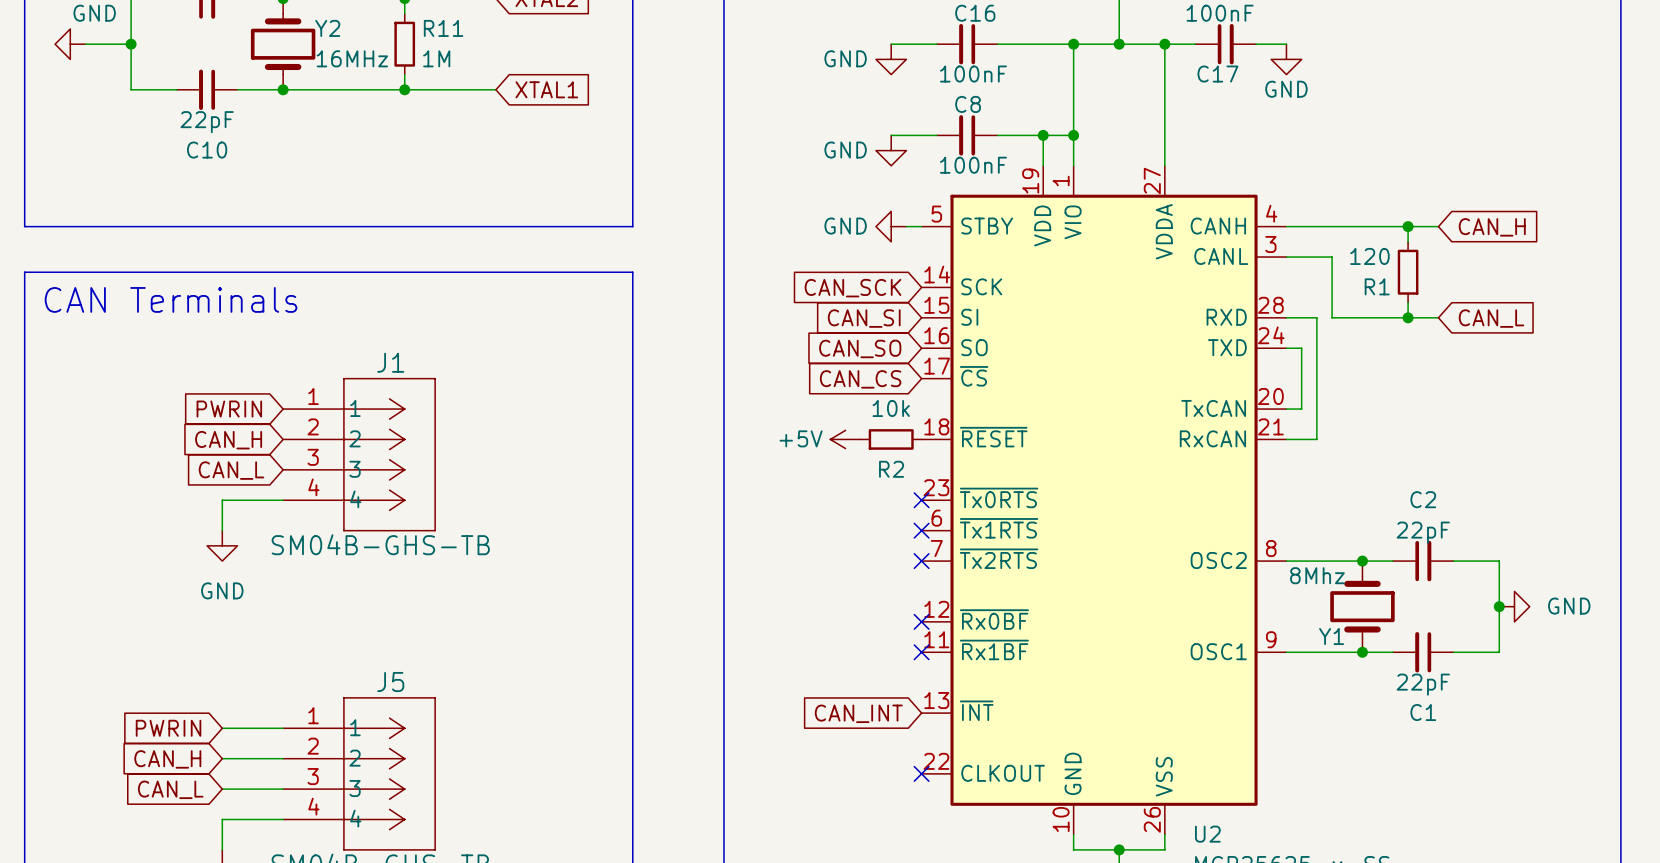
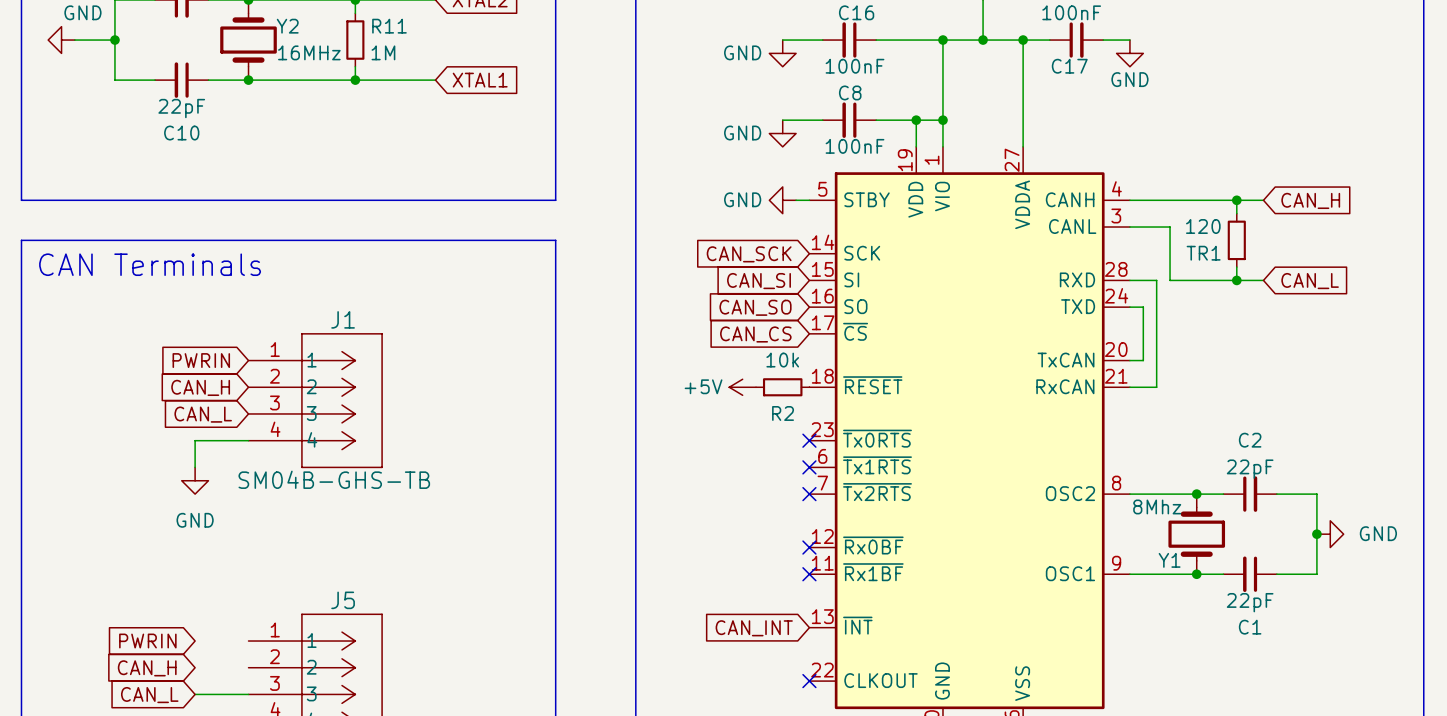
R1 name: R1 (1377, 286) -> TR1 (1203, 253)
wire: (222, 728) (283, 728) -> none
wire: (222, 758) (283, 758) -> none

